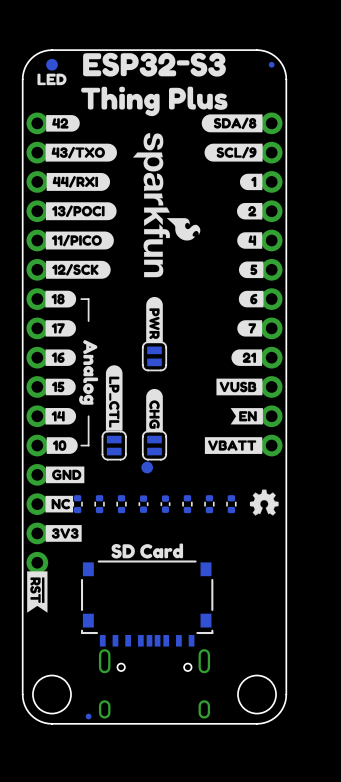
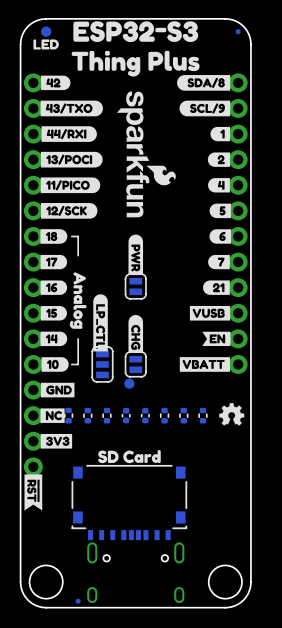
part footprint: [101, 430, 127, 461] -> [91, 346, 114, 383]

